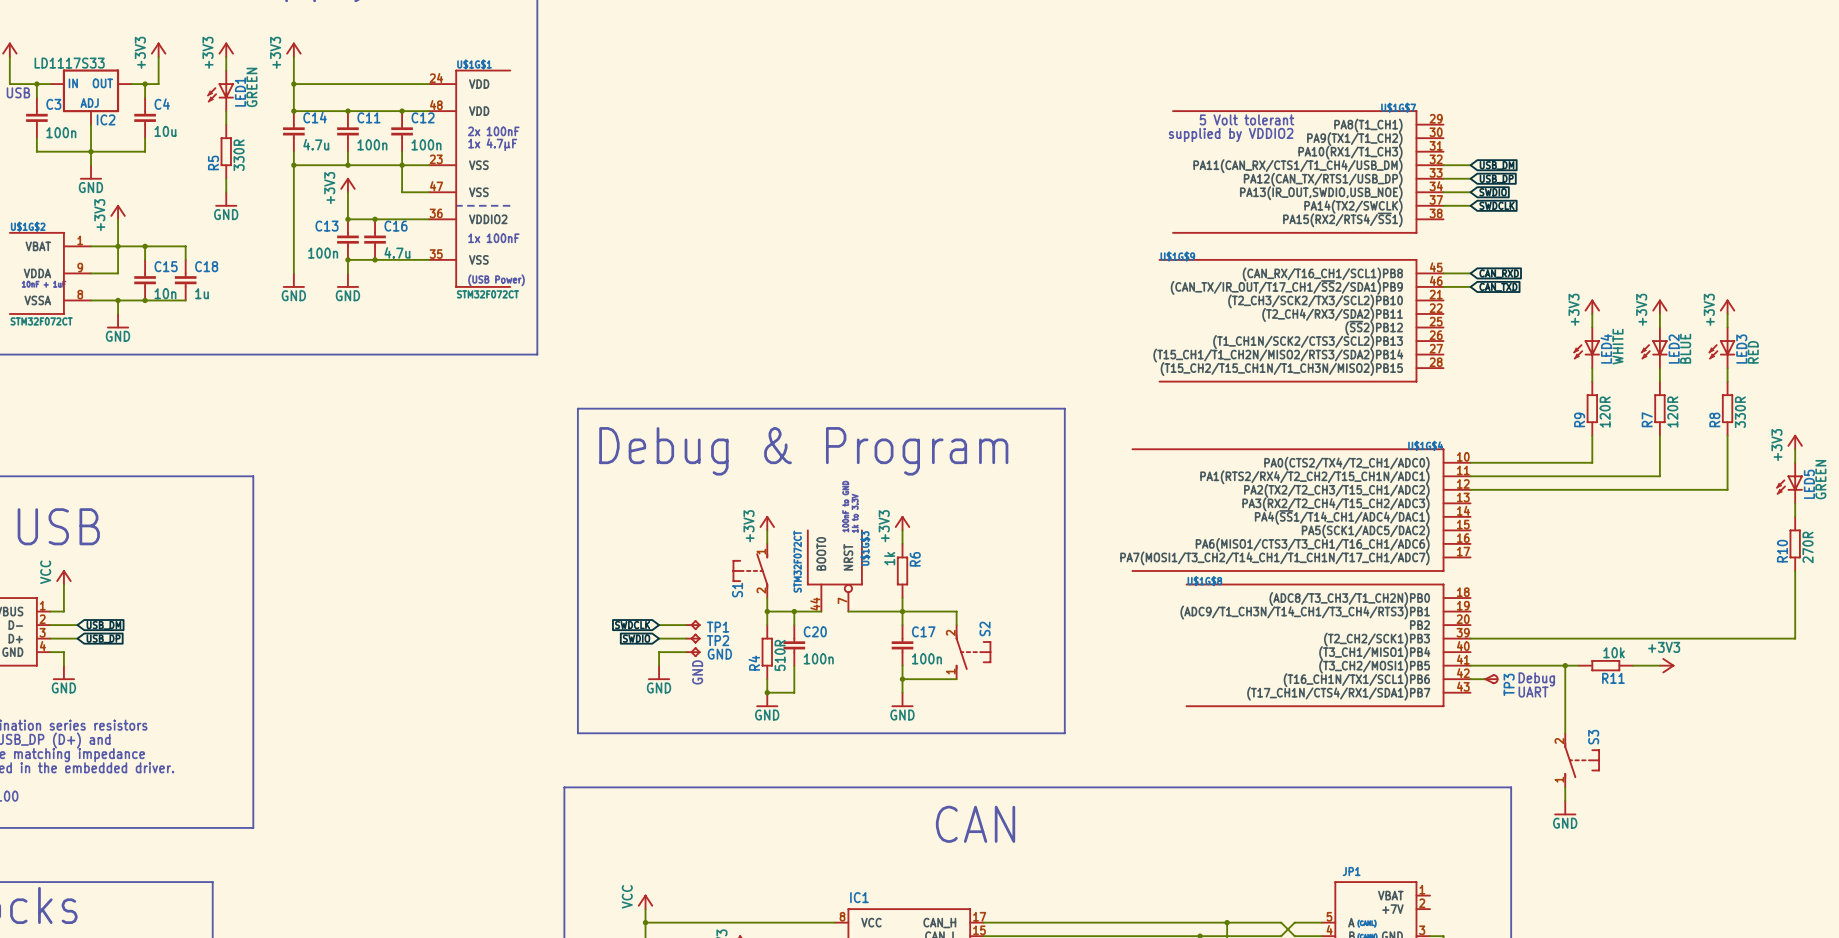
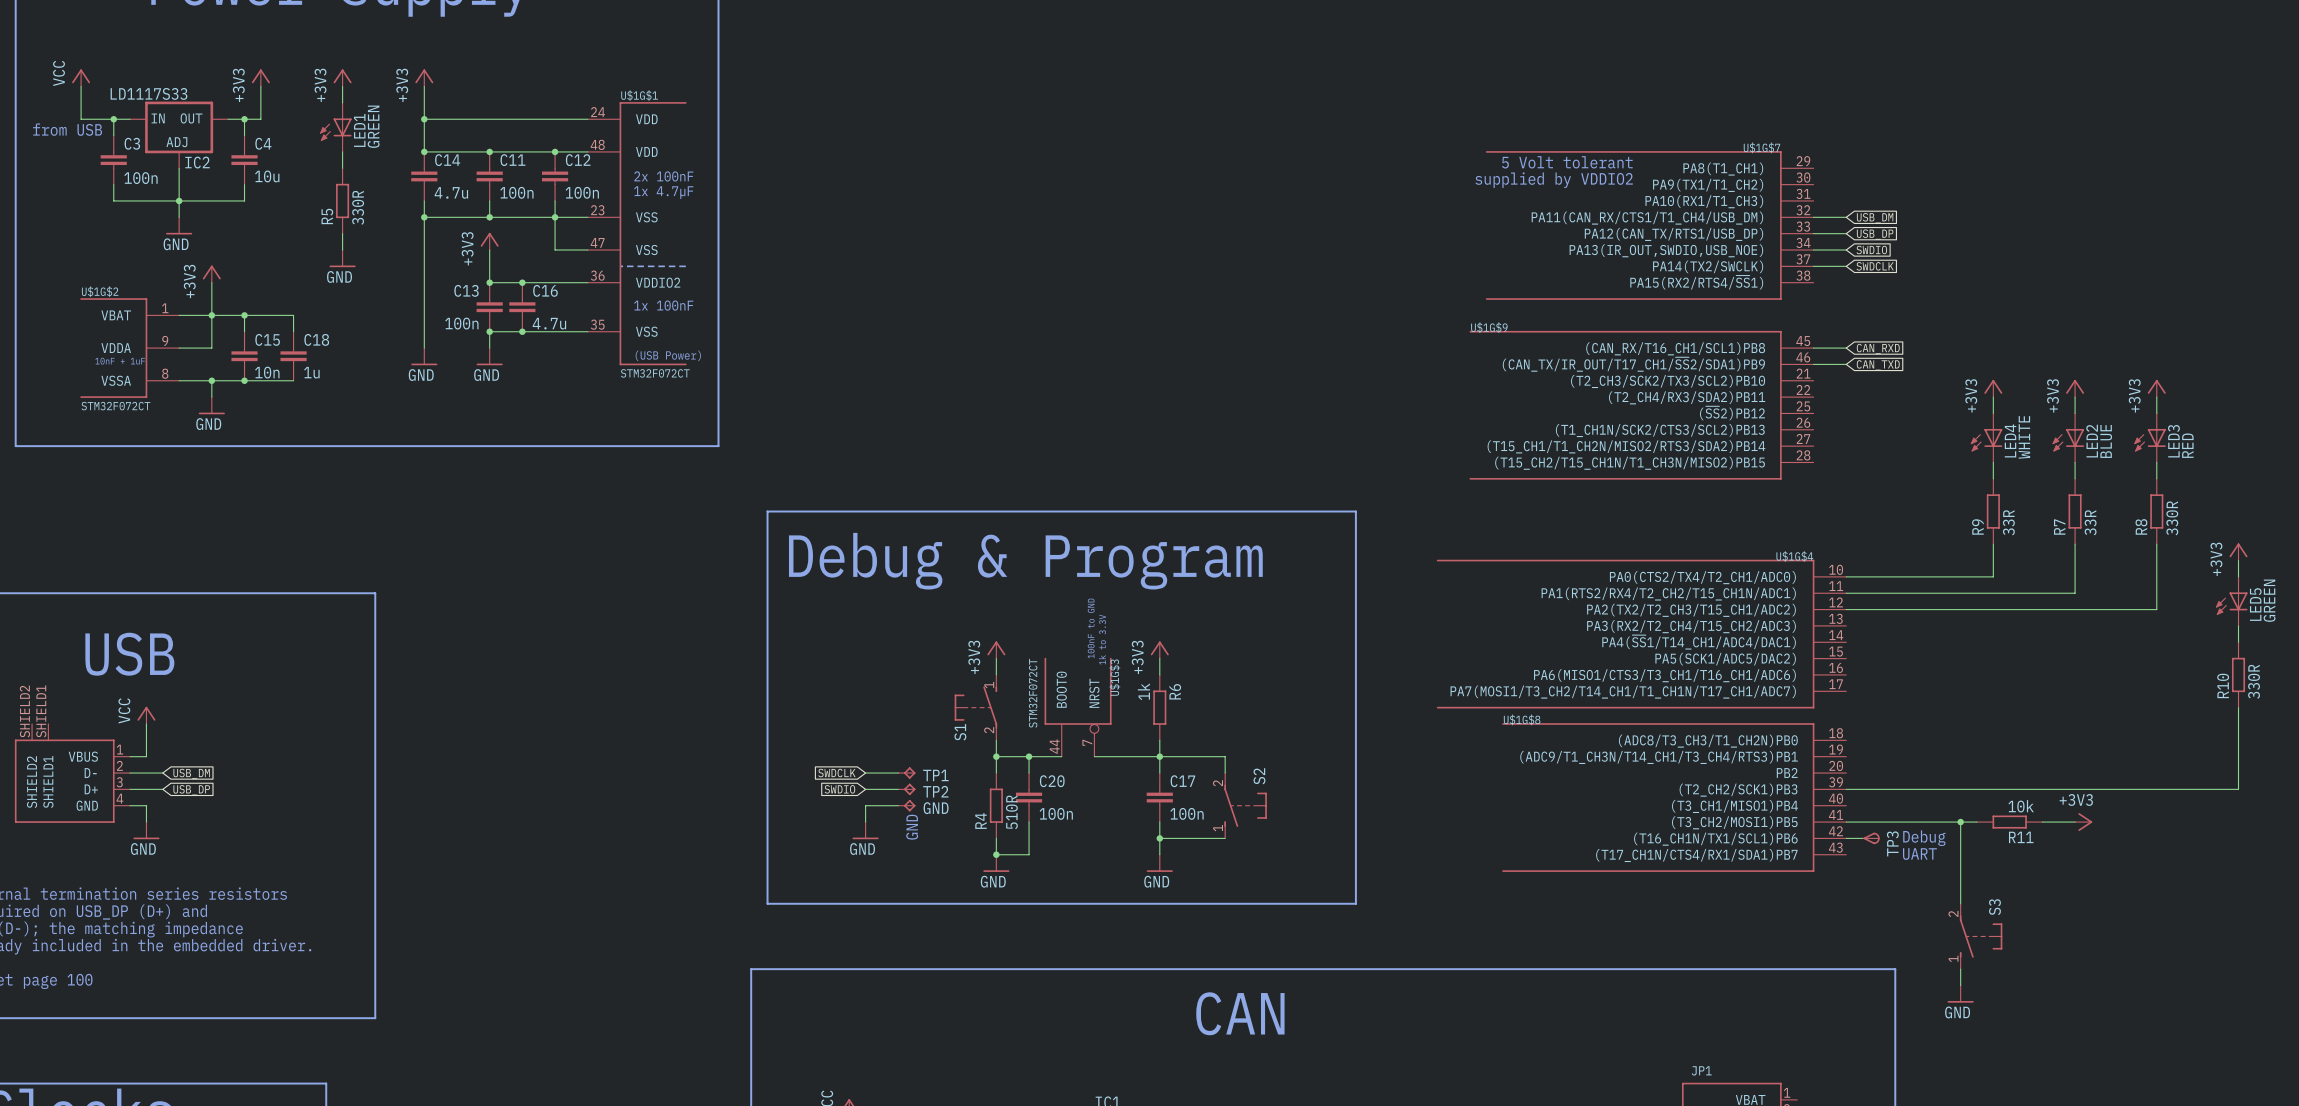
R9 value: 120R (1605, 412) -> 33R (2008, 522)
R7 value: 120R (1672, 412) -> 33R (2090, 522)
R10 value: 270R (1808, 547) -> 330R (2254, 681)

